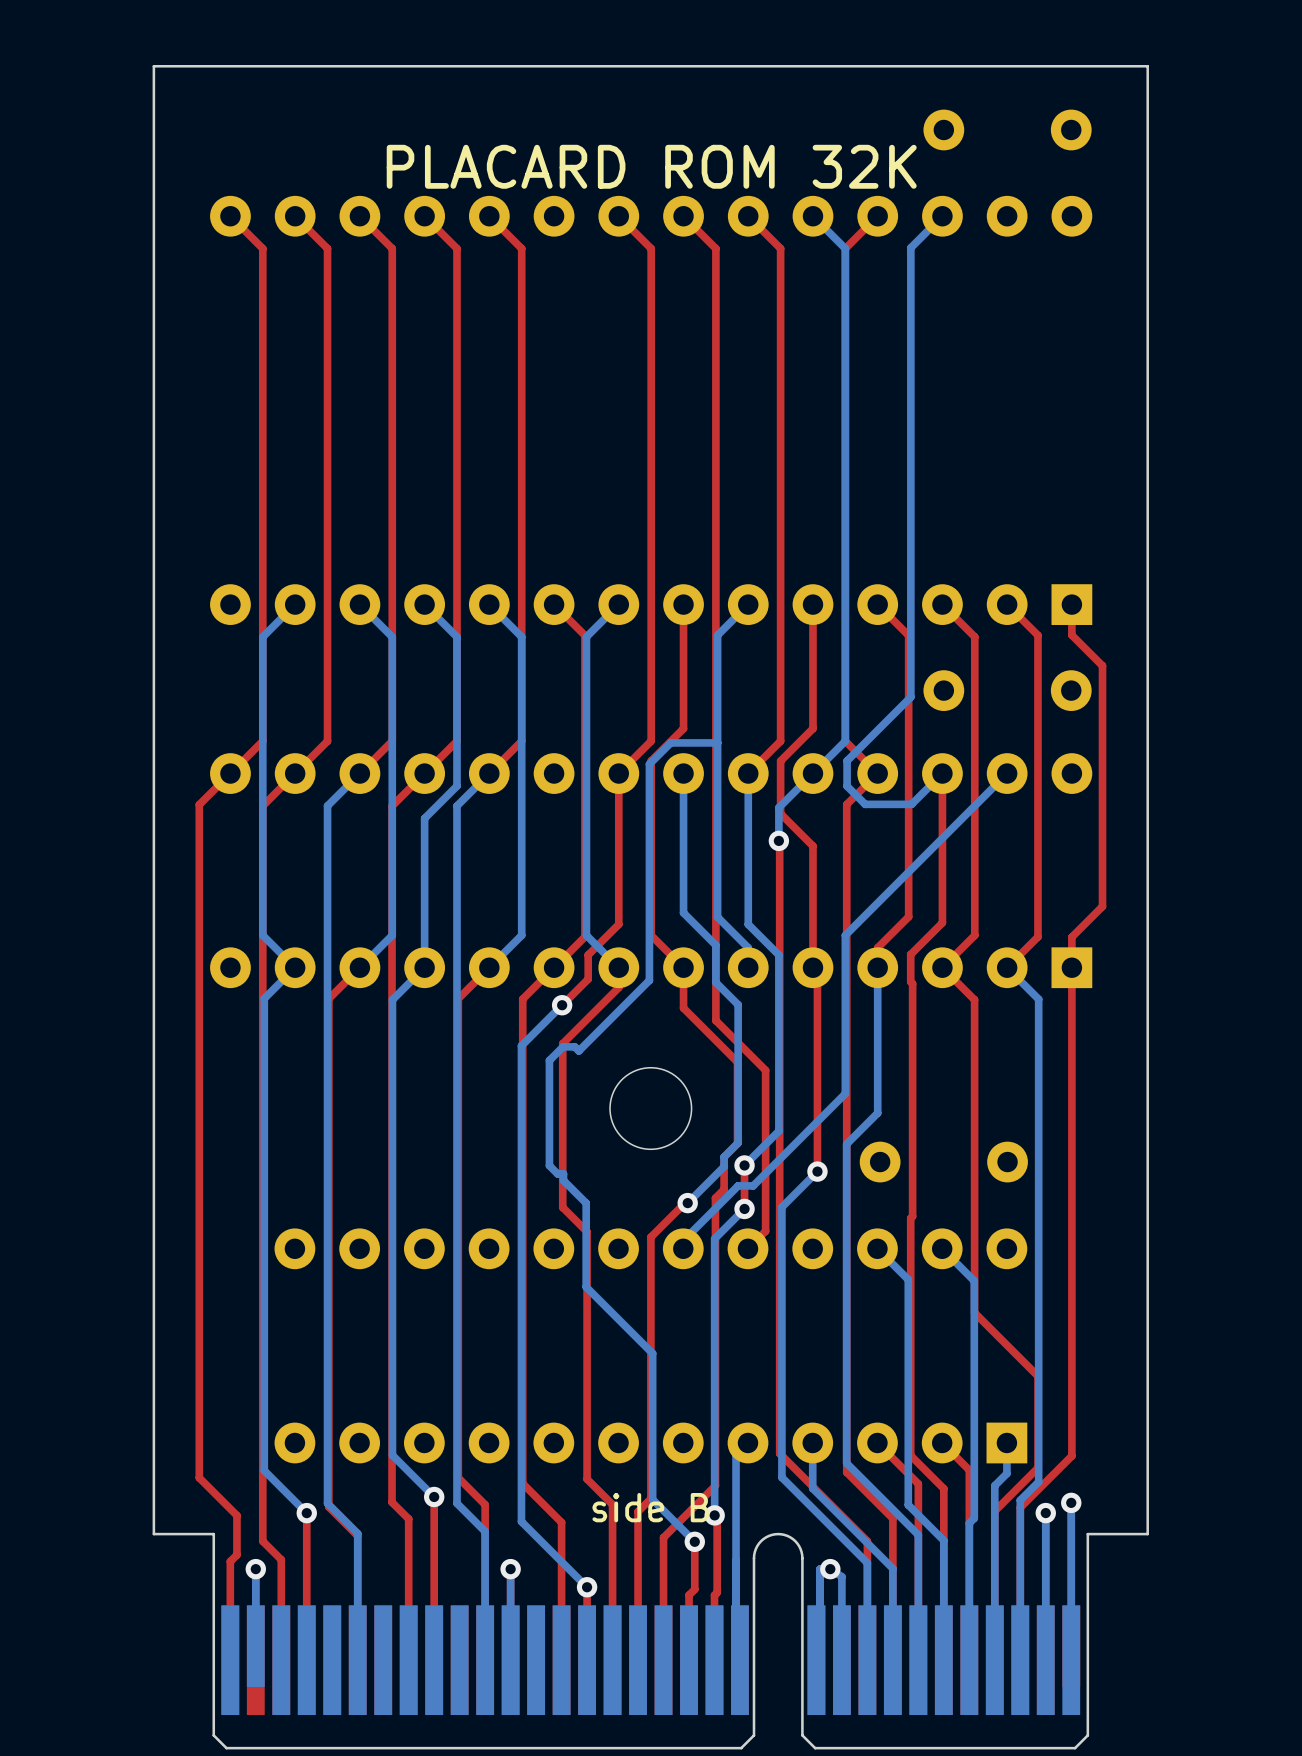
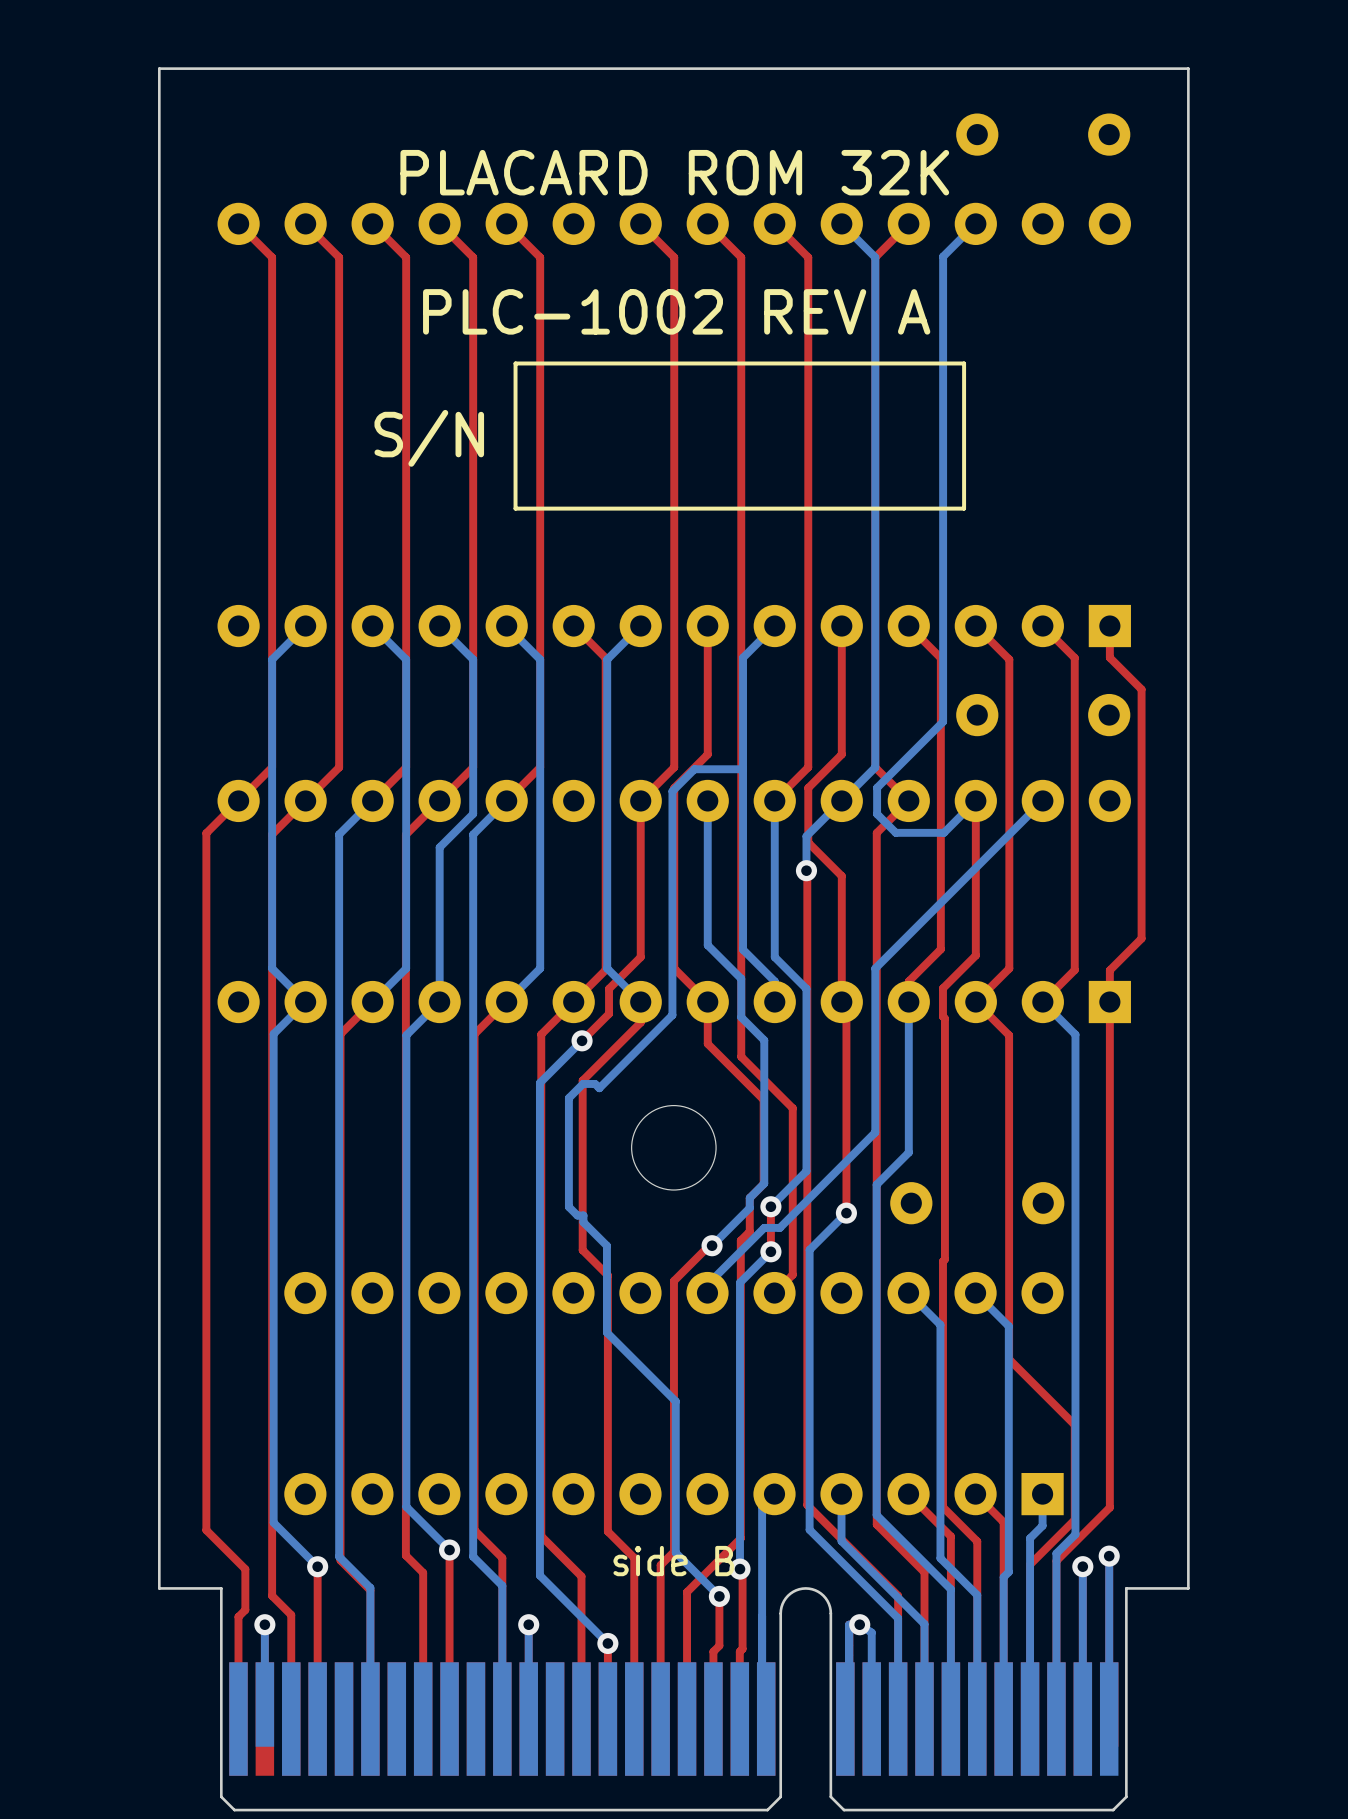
text: none -> PLC-1002 REV A (676, 311)
line: none -> (964, 363) (515, 363) (515, 508) (964, 508) (964, 363)
text: none -> S/N (429, 438)

